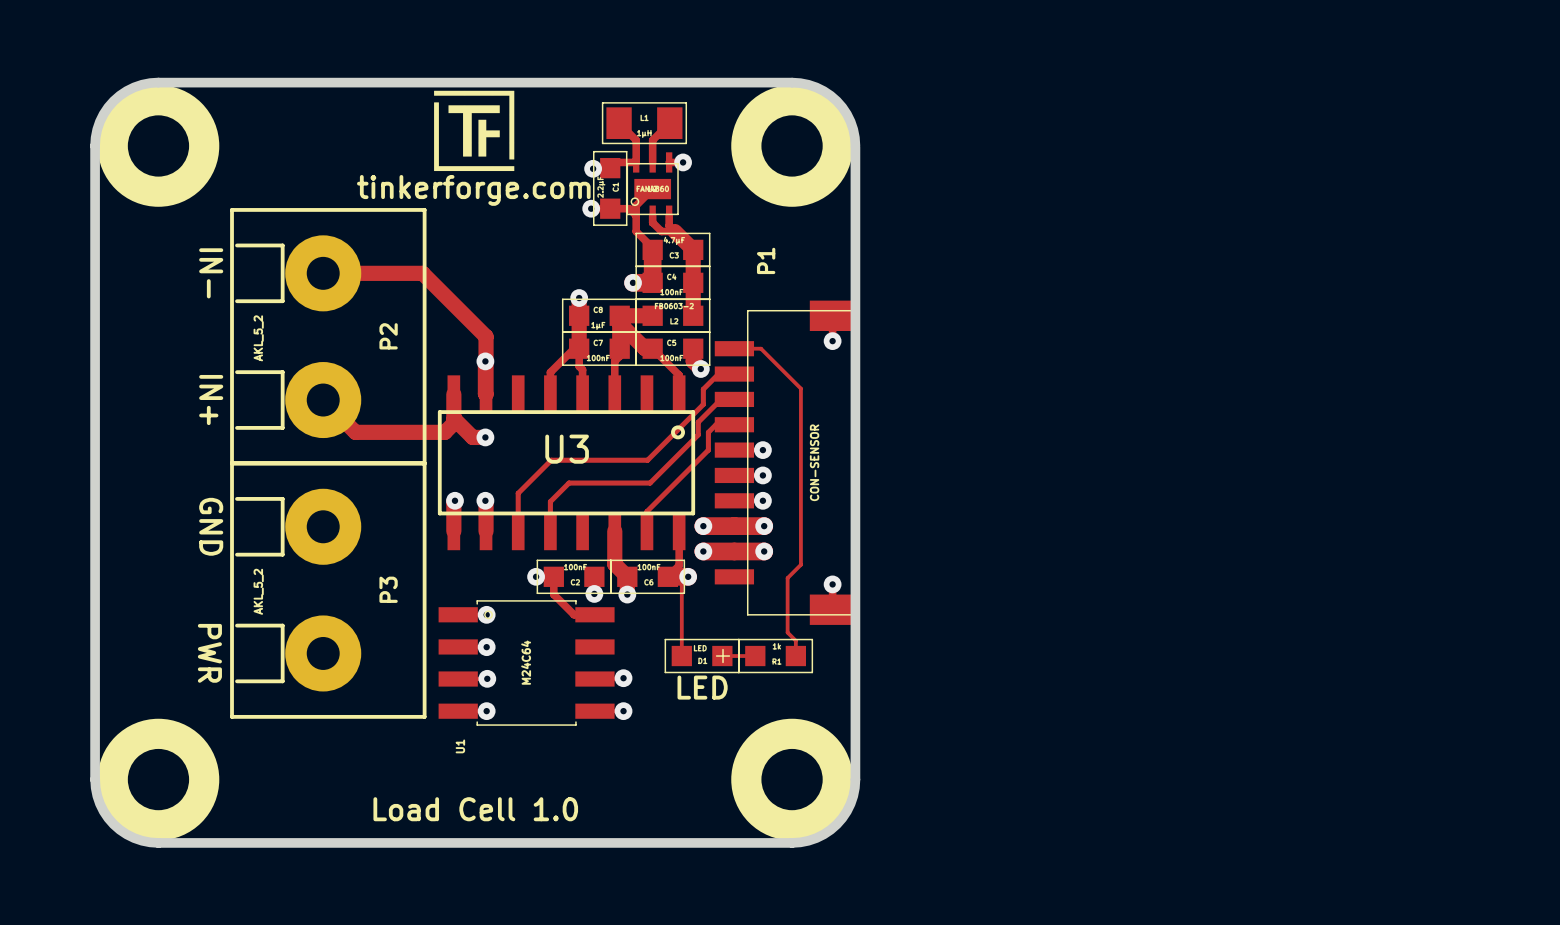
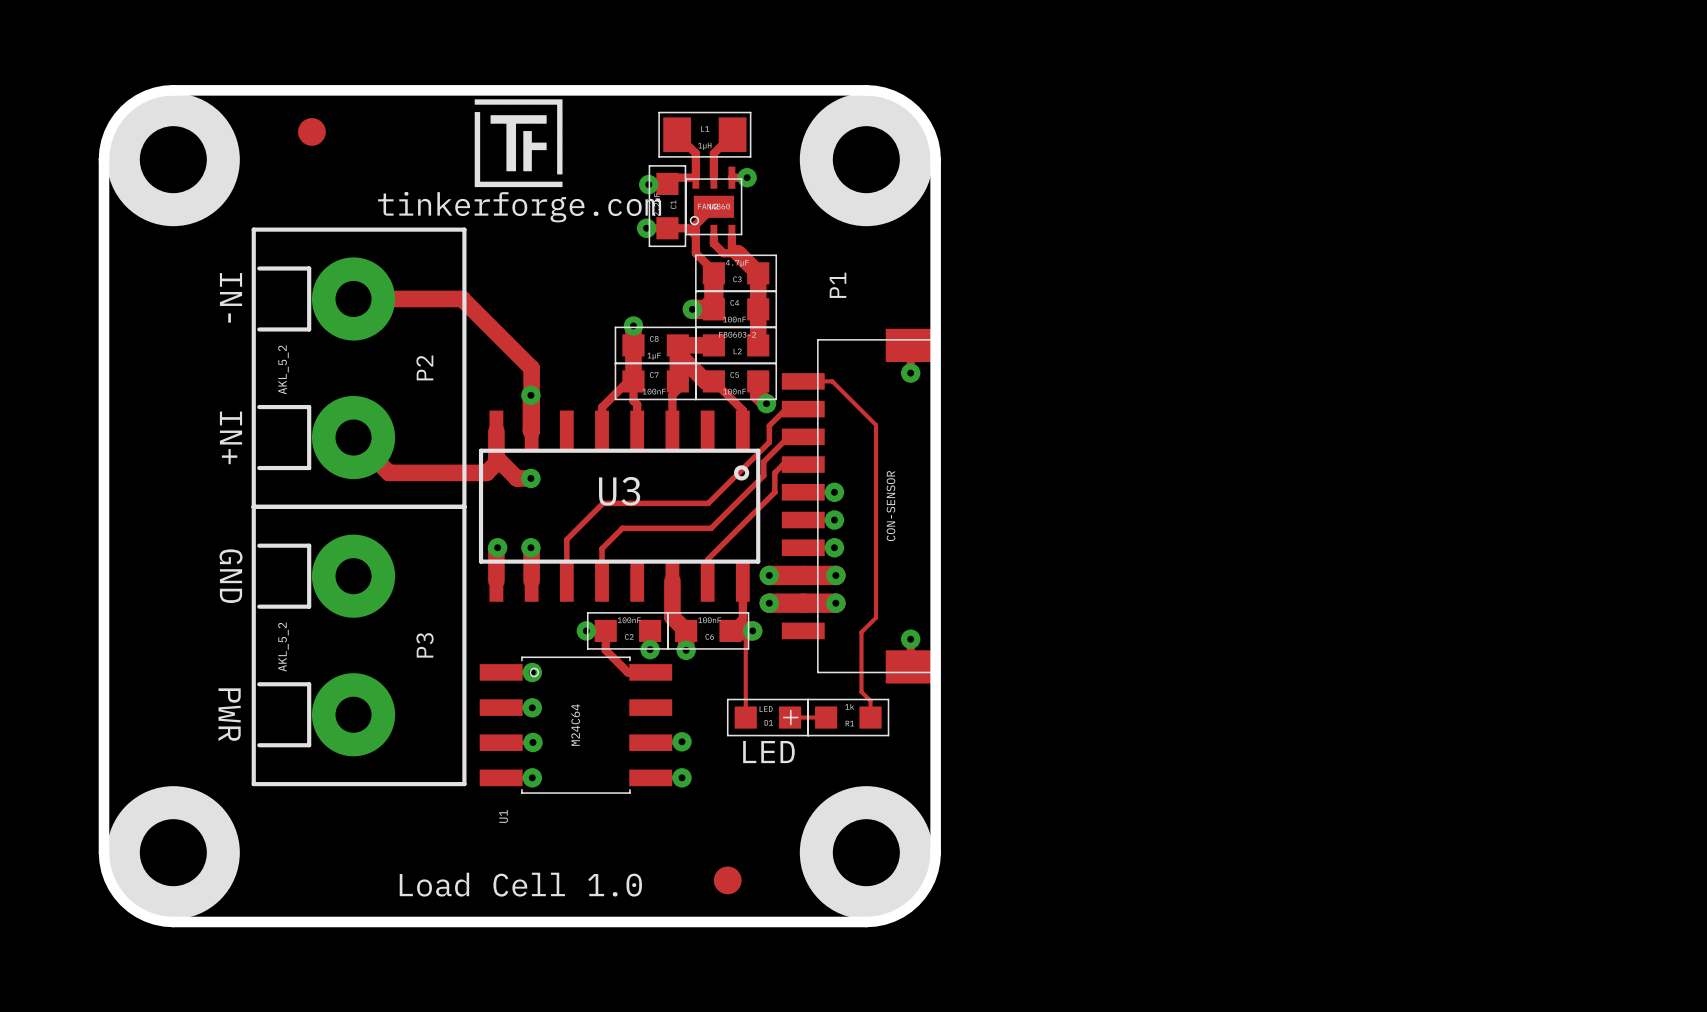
part: none -> (311, 131)
part: none -> (727, 880)

